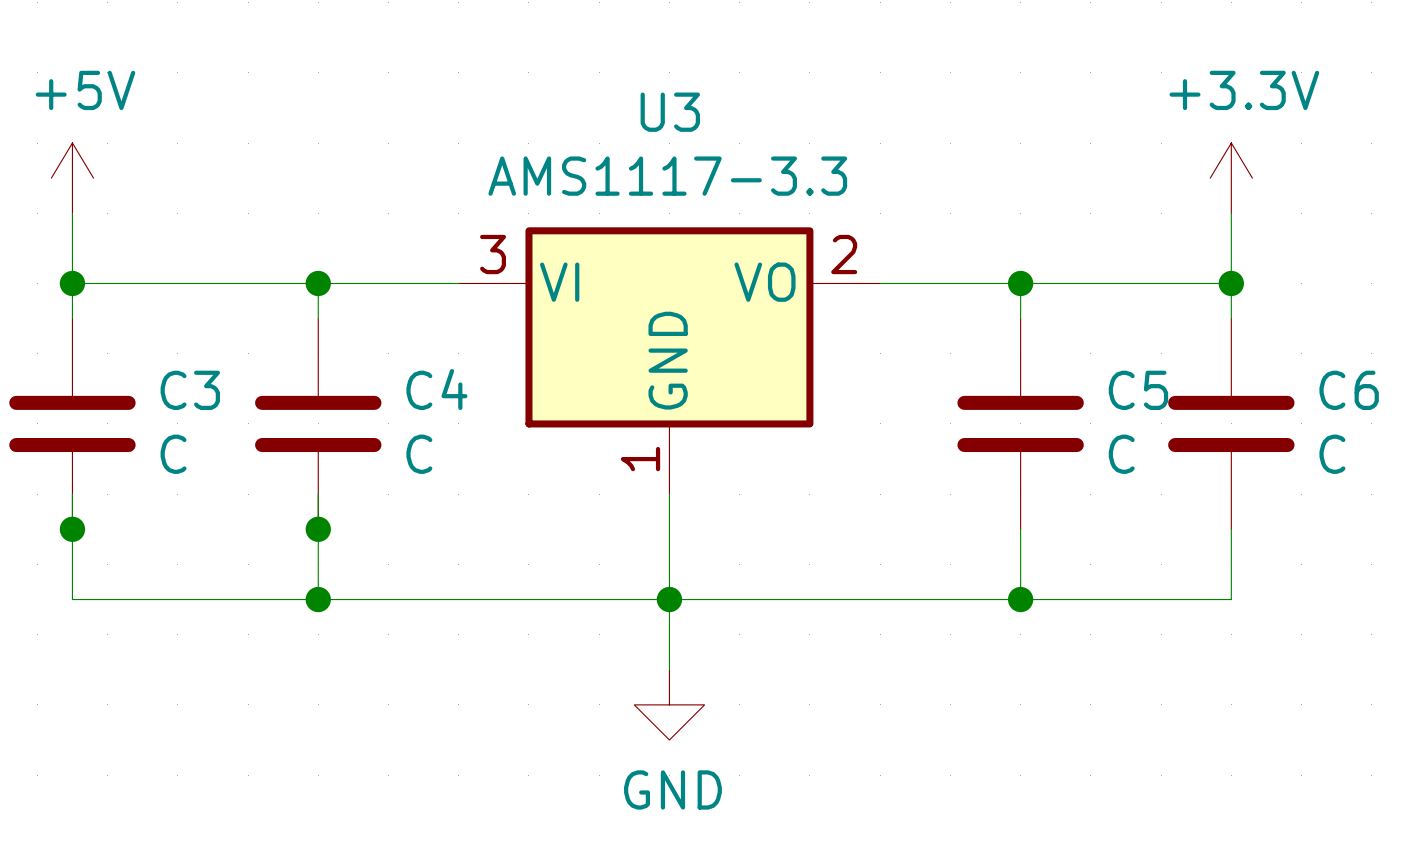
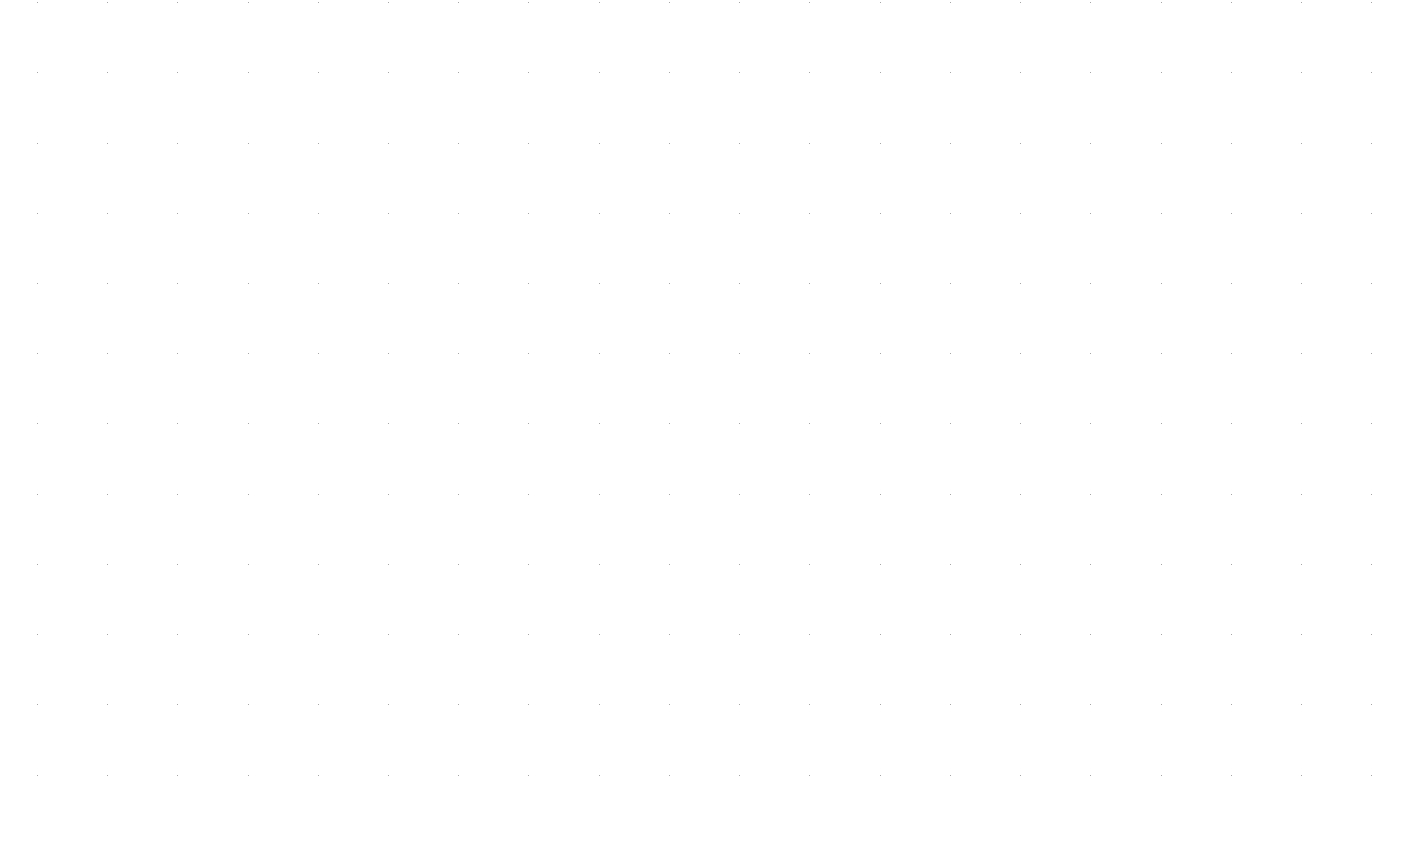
power symbol: +5V (72, 178) -> none
power symbol: +3.3V (1231, 178) -> none
wire: (72, 213) (72, 318) -> none
wire: (1231, 213) (1231, 318) -> none
wire: (72, 283) (458, 283) -> none
junction: (72, 283) -> none
wire: (318, 283) (318, 318) -> none
junction: (318, 283) -> none
wire: (880, 283) (1231, 283) -> none
wire: (1020, 283) (1020, 318) -> none
junction: (1020, 283) -> none
junction: (1231, 283) -> none
U3: AMS1117-3.3 (669, 360) -> none
C3: C (72, 423) -> none
C4: C (318, 423) -> none
C5: C (1020, 423) -> none
C6: C (1231, 423) -> none
wire: (72, 494) (72, 599) (1231, 599) (1231, 529) -> none
wire: (318, 494) (318, 599) -> none
wire: (669, 494) (669, 669) -> none
junction: (72, 529) -> none
junction: (318, 529) -> none
wire: (1020, 529) (1020, 599) -> none
junction: (318, 599) -> none
junction: (669, 599) -> none
junction: (1020, 599) -> none
power symbol: GND (669, 704) -> none

